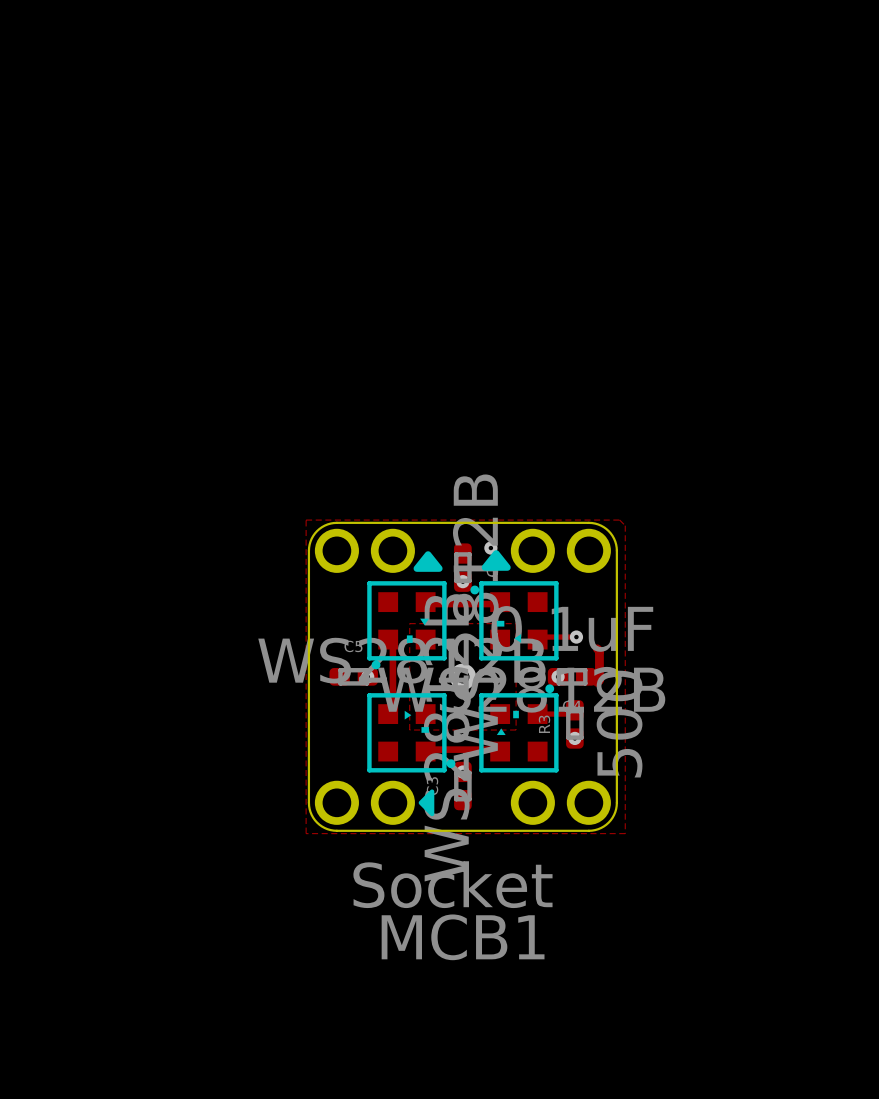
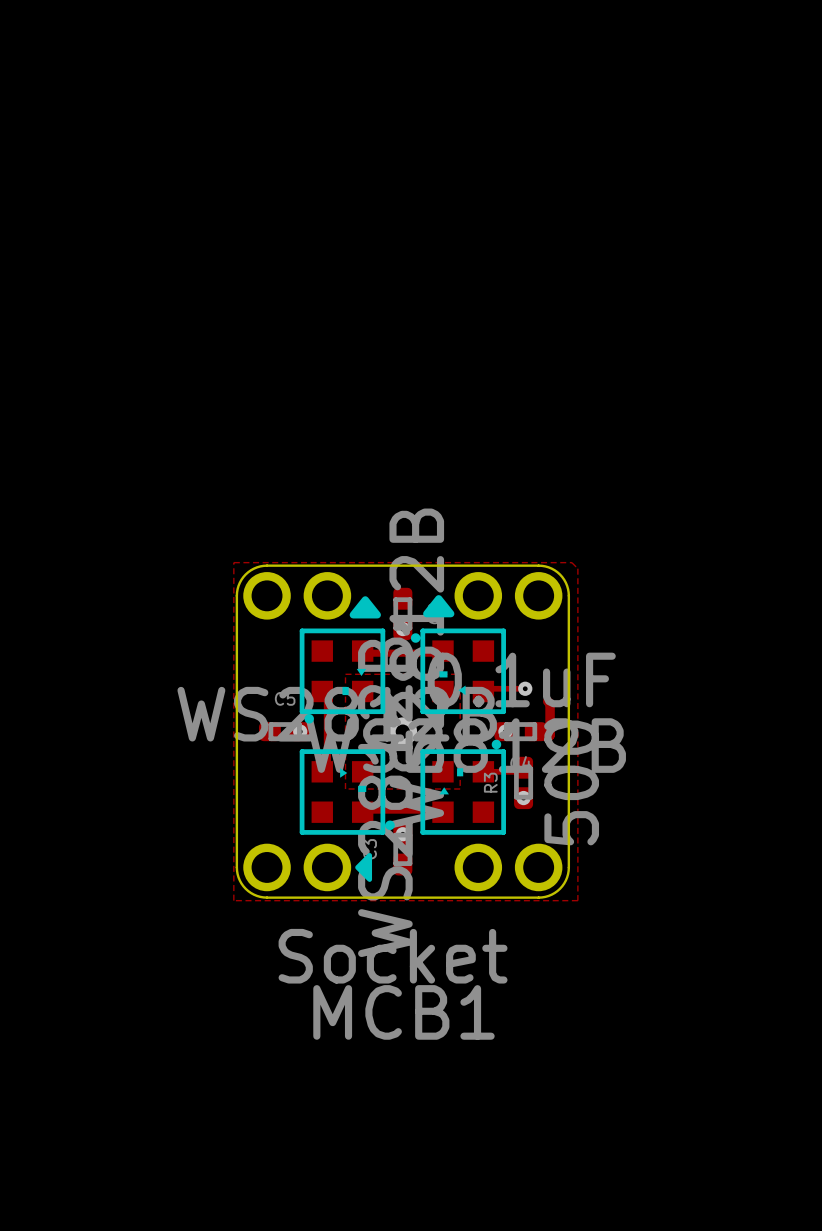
via: (490, 548) -> none

